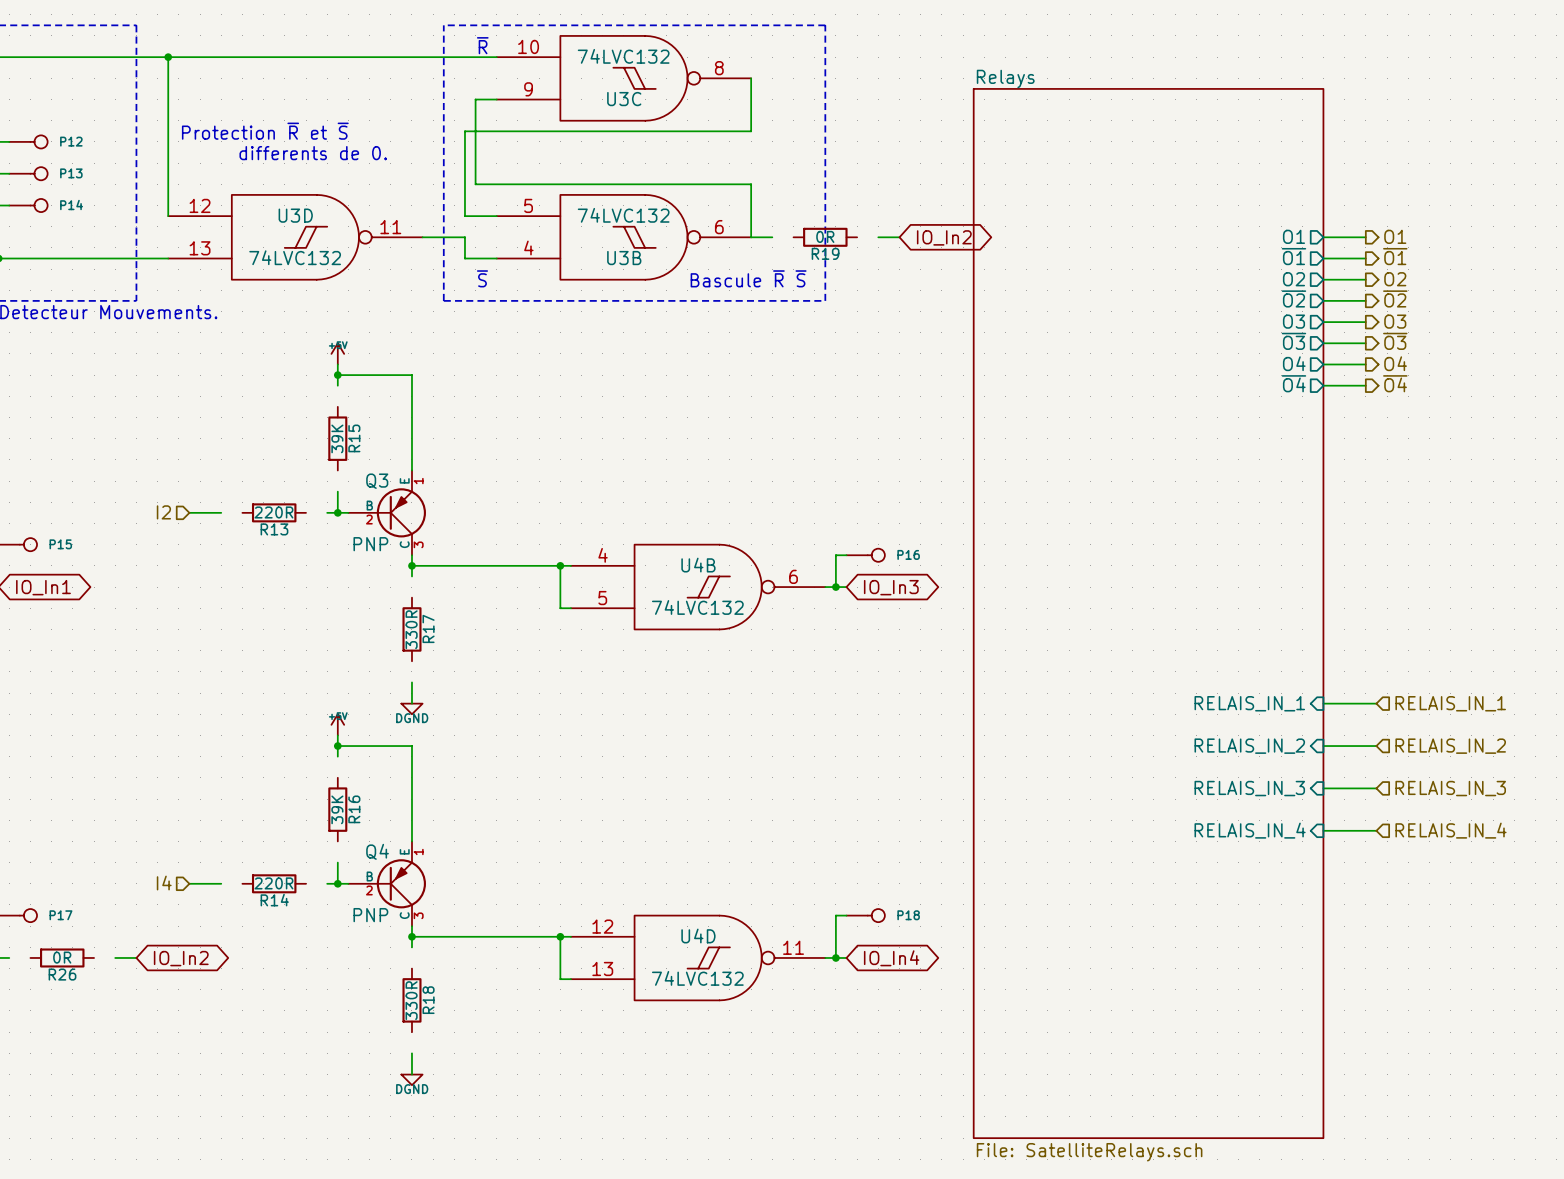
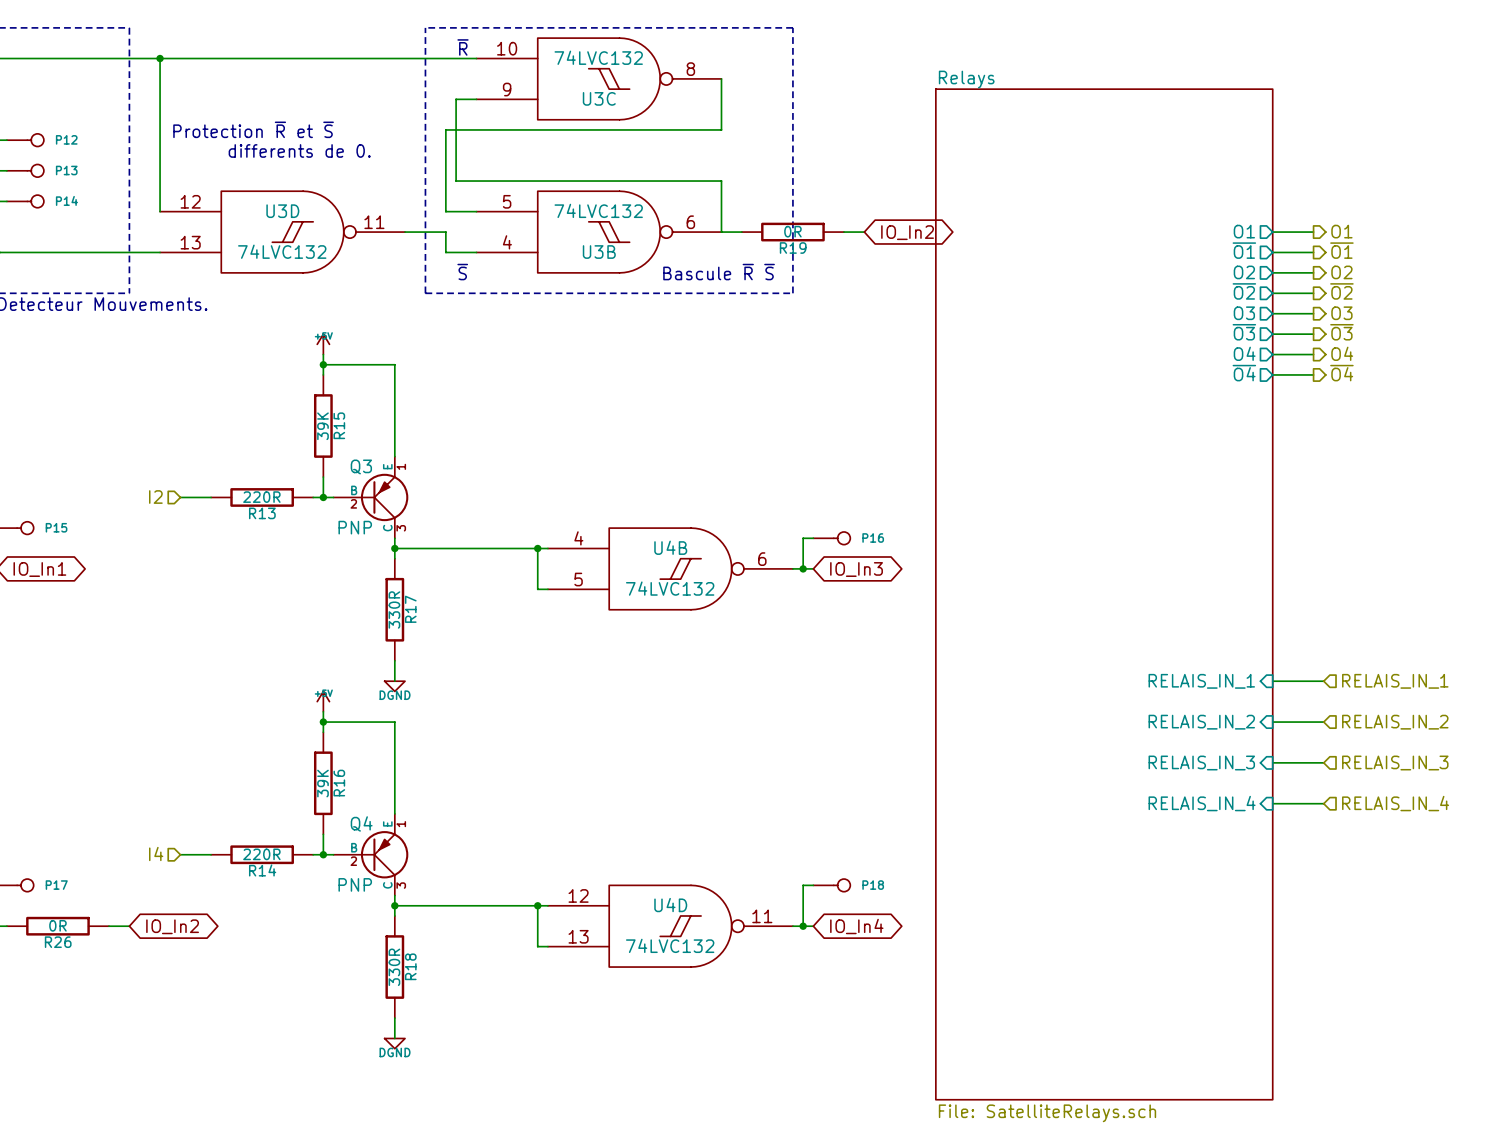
R19 symbol: [793, 227, 858, 247] -> [741, 222, 844, 242]
R15 symbol: [328, 406, 348, 471] -> [313, 374, 333, 478]
R13 symbol: [242, 503, 307, 523] -> [211, 488, 314, 507]
R17 symbol: [402, 597, 422, 662] -> [385, 558, 405, 661]
R16 symbol: [328, 777, 348, 842] -> [313, 732, 333, 835]
R14 symbol: [242, 874, 307, 894] -> [211, 845, 314, 865]
R26 symbol: [30, 948, 95, 968] -> [6, 916, 110, 936]
R18 symbol: [402, 968, 422, 1033] -> [385, 916, 405, 1019]

